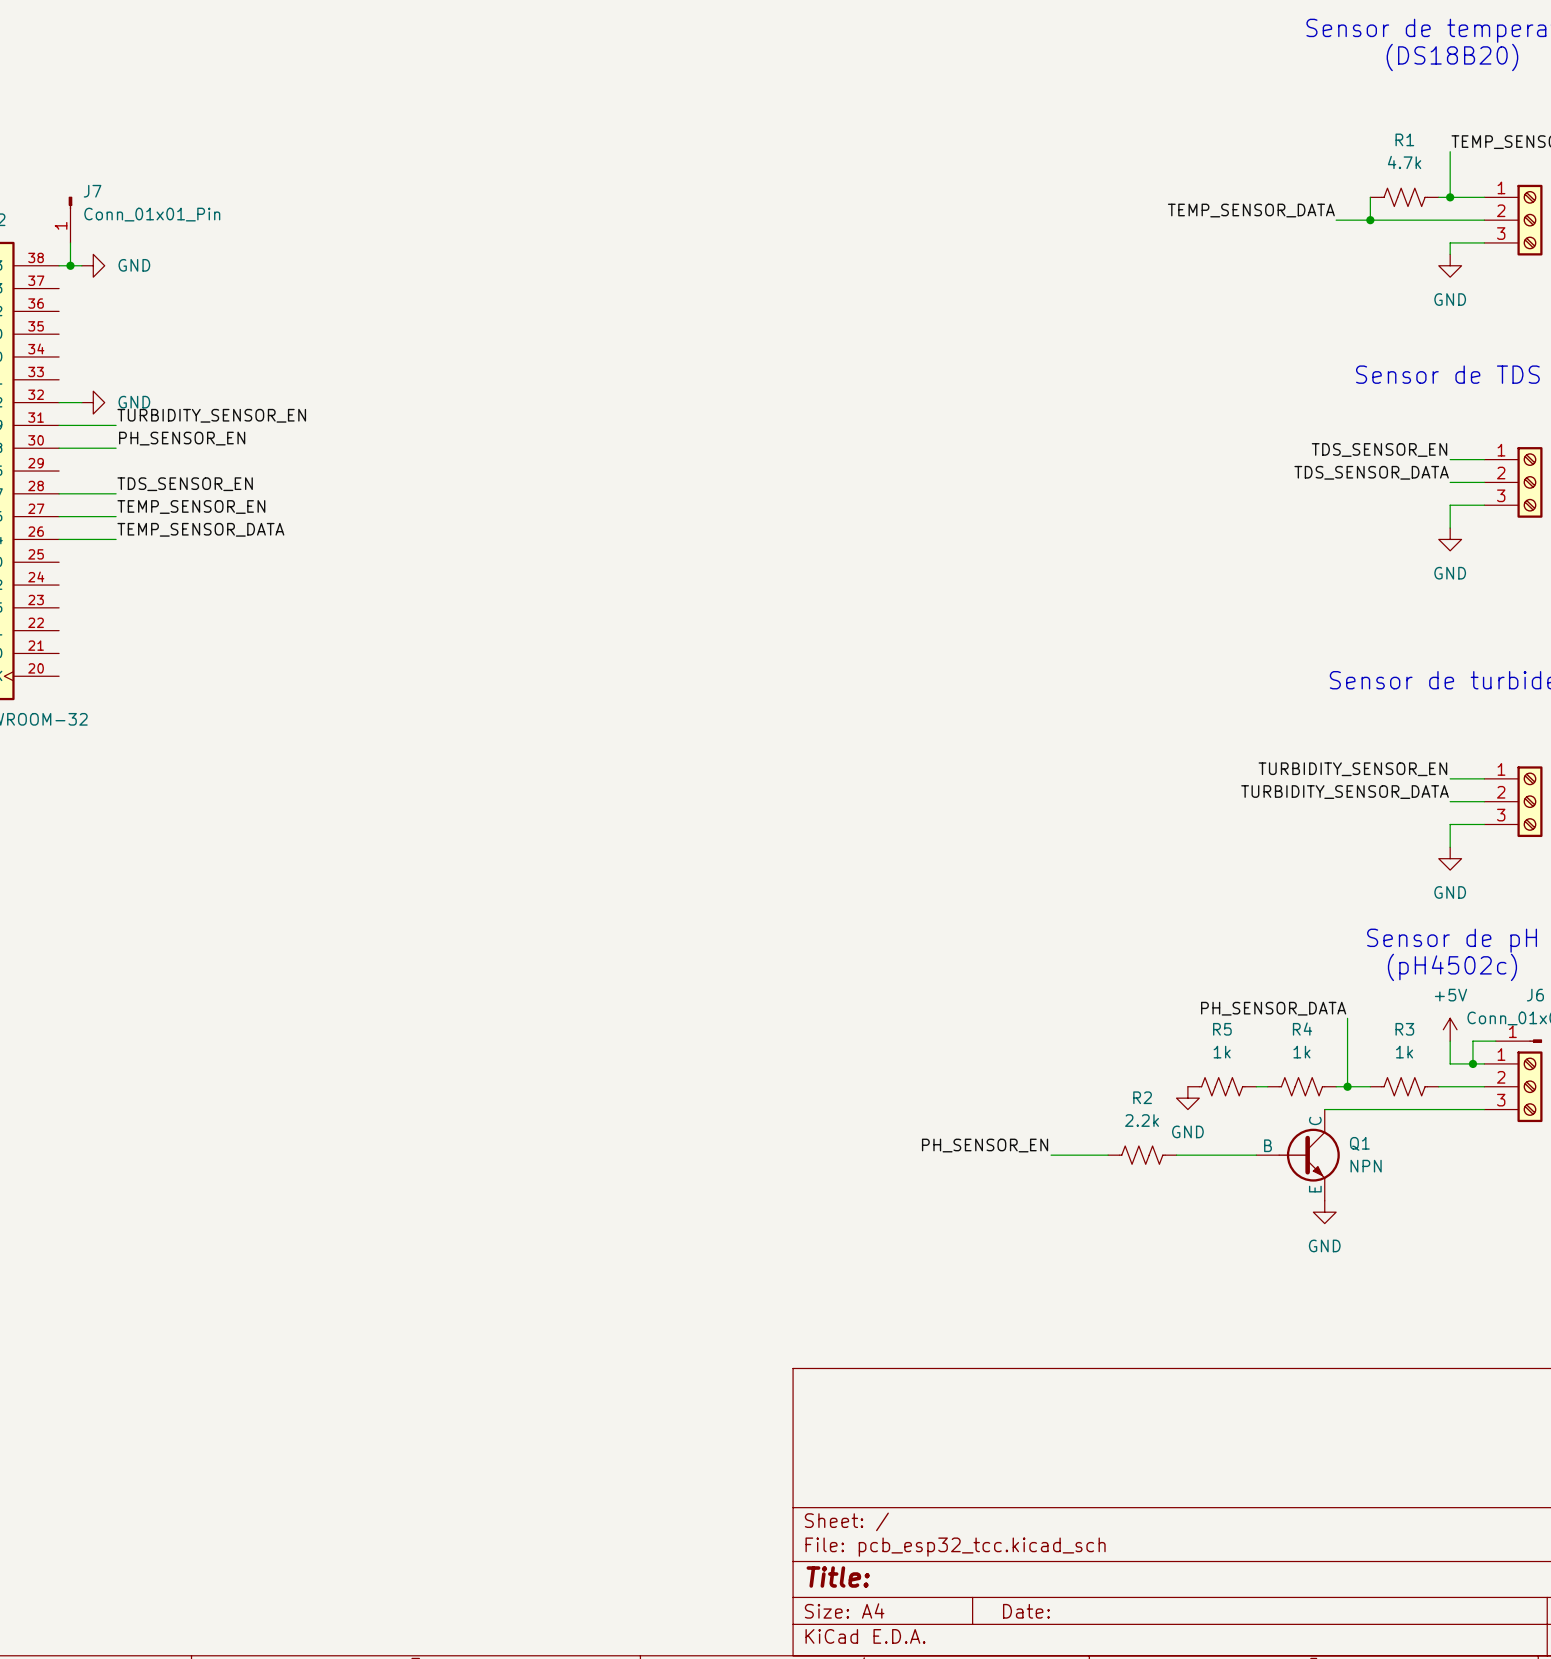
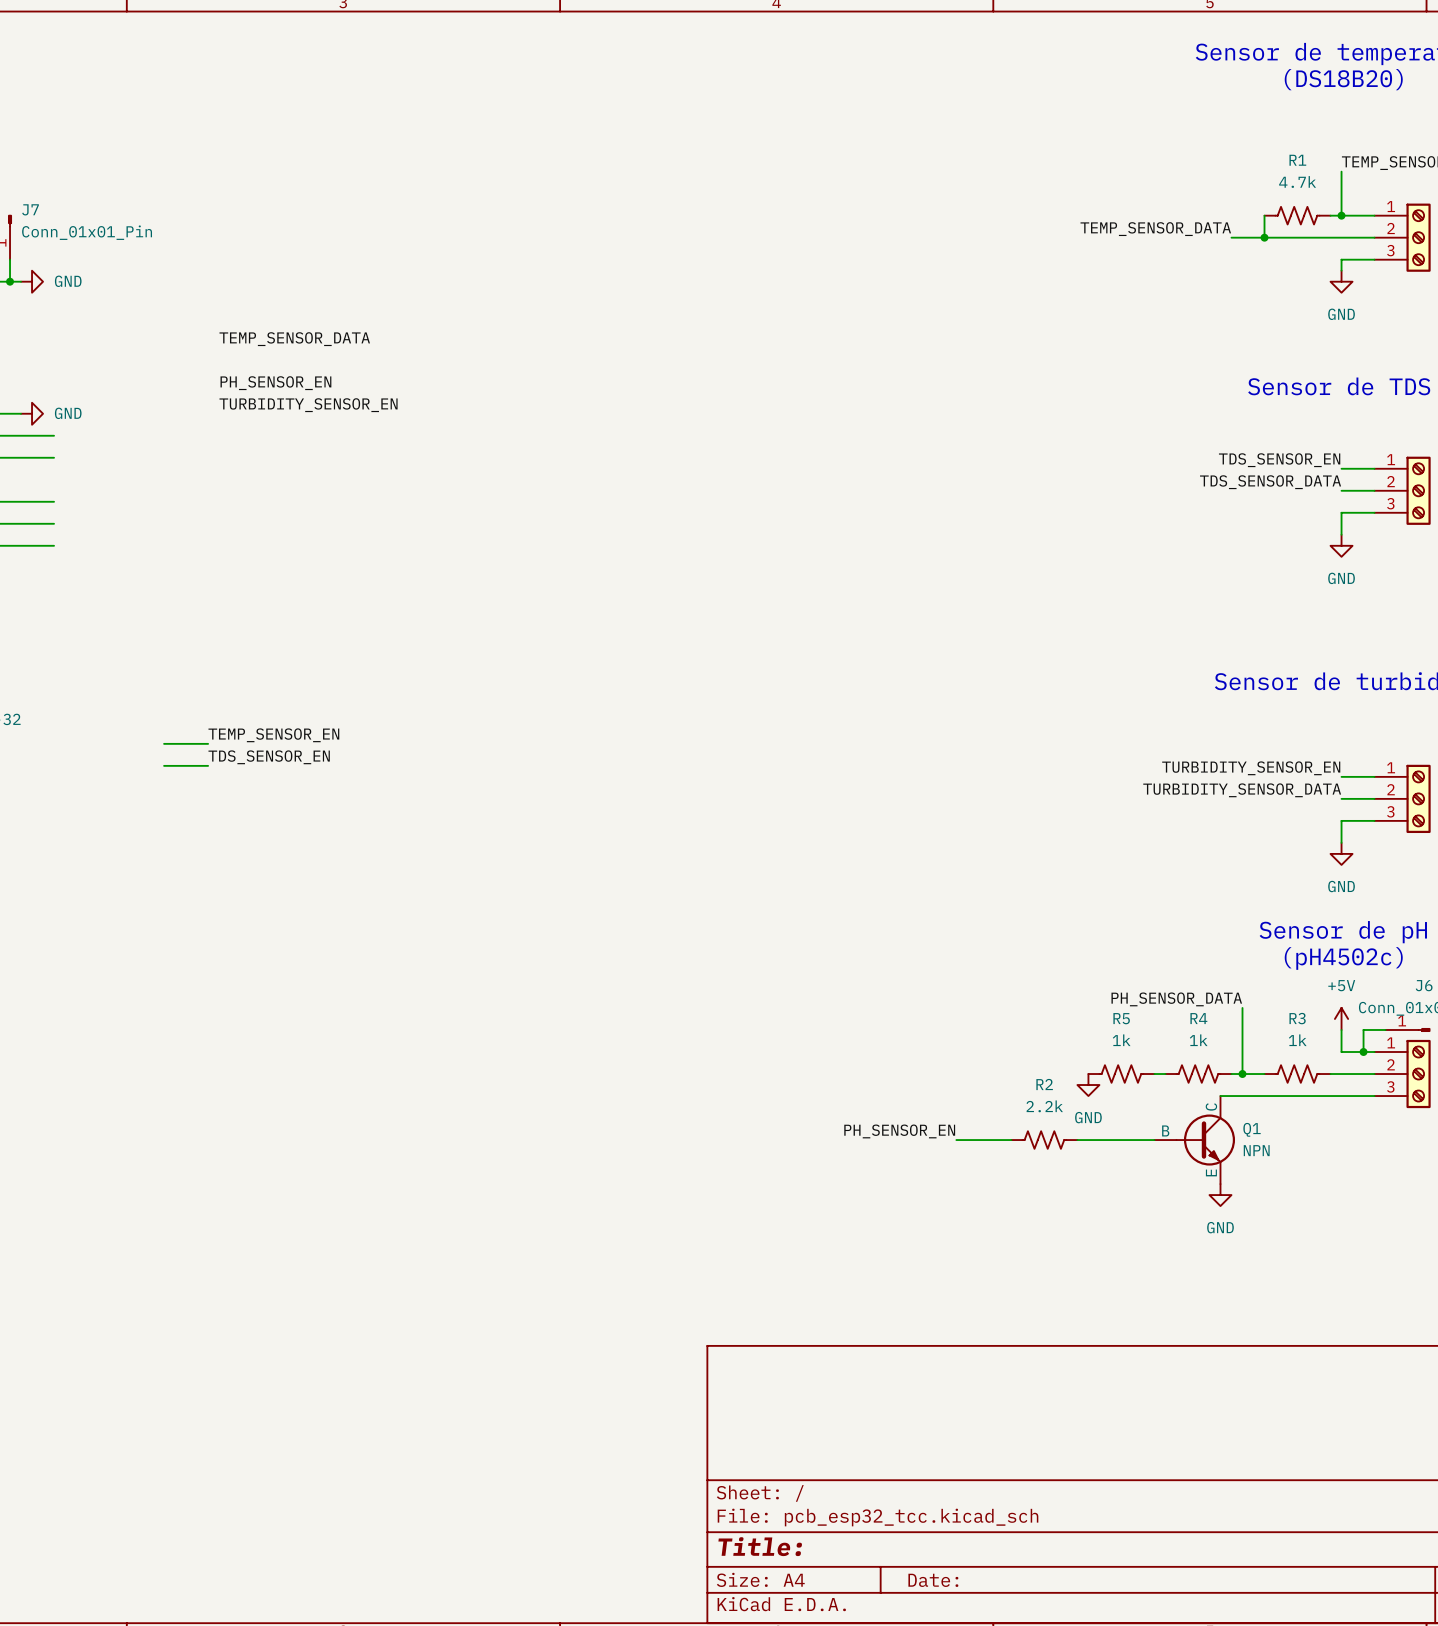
label: none -> TEMP_SENSOR_DATA (294, 339)
label position: TURBIDITY_SENSOR_EN (211, 415) -> TURBIDITY_SENSOR_EN (308, 405)
label position: PH_SENSOR_EN (182, 438) -> PH_SENSOR_EN (275, 383)
label: TDS_SENSOR_EN (185, 484) -> none
label: TEMP_SENSOR_EN (191, 506) -> none
label: TEMP_SENSOR_DATA (200, 529) -> none
label: none -> TEMP_SENSOR_EN (273, 735)
wire: none -> (164, 743) (208, 743)
label: none -> TDS_SENSOR_EN (269, 757)
wire: none -> (164, 765) (208, 765)

